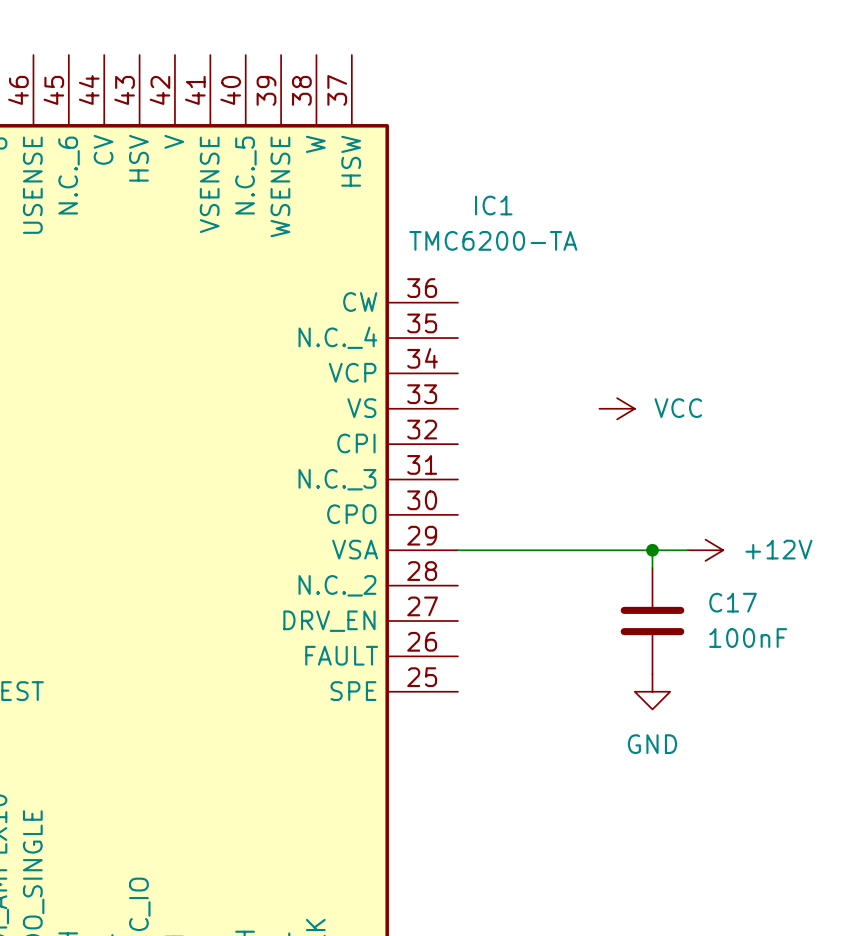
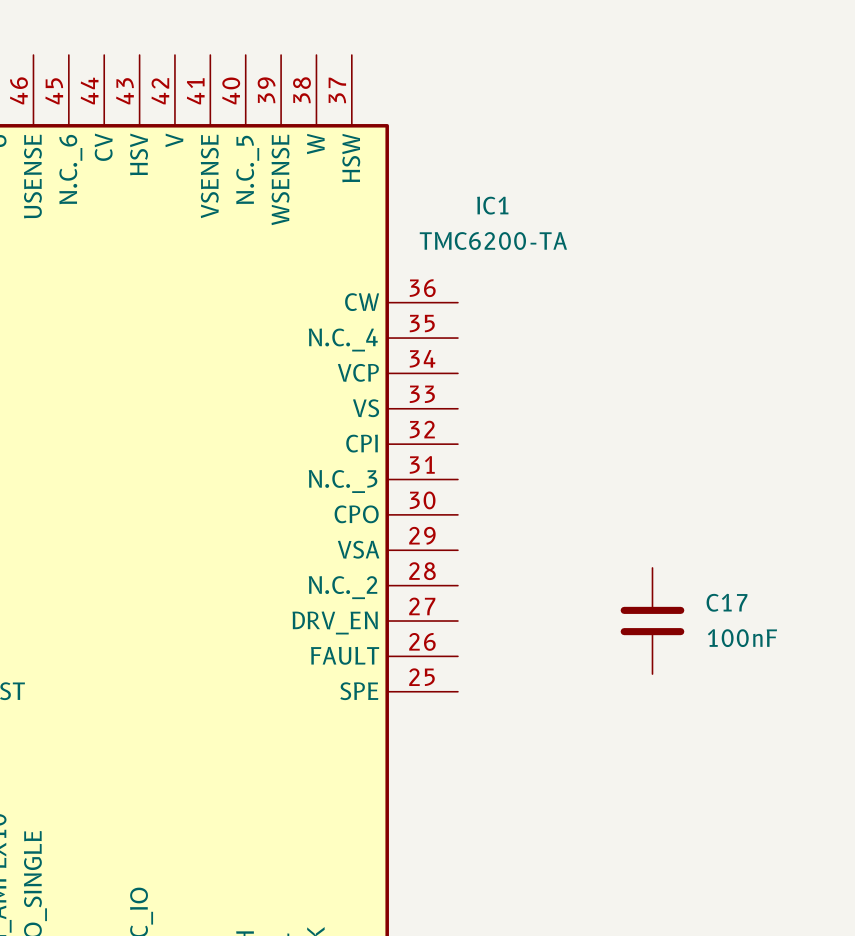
power symbol: VCC (617, 408) -> none
wire: (457, 550) (687, 550) -> none
wire: (652, 550) (652, 567) -> none
junction: (652, 550) -> none
power symbol: +12V (705, 550) -> none
power symbol: GND (652, 691) -> none

